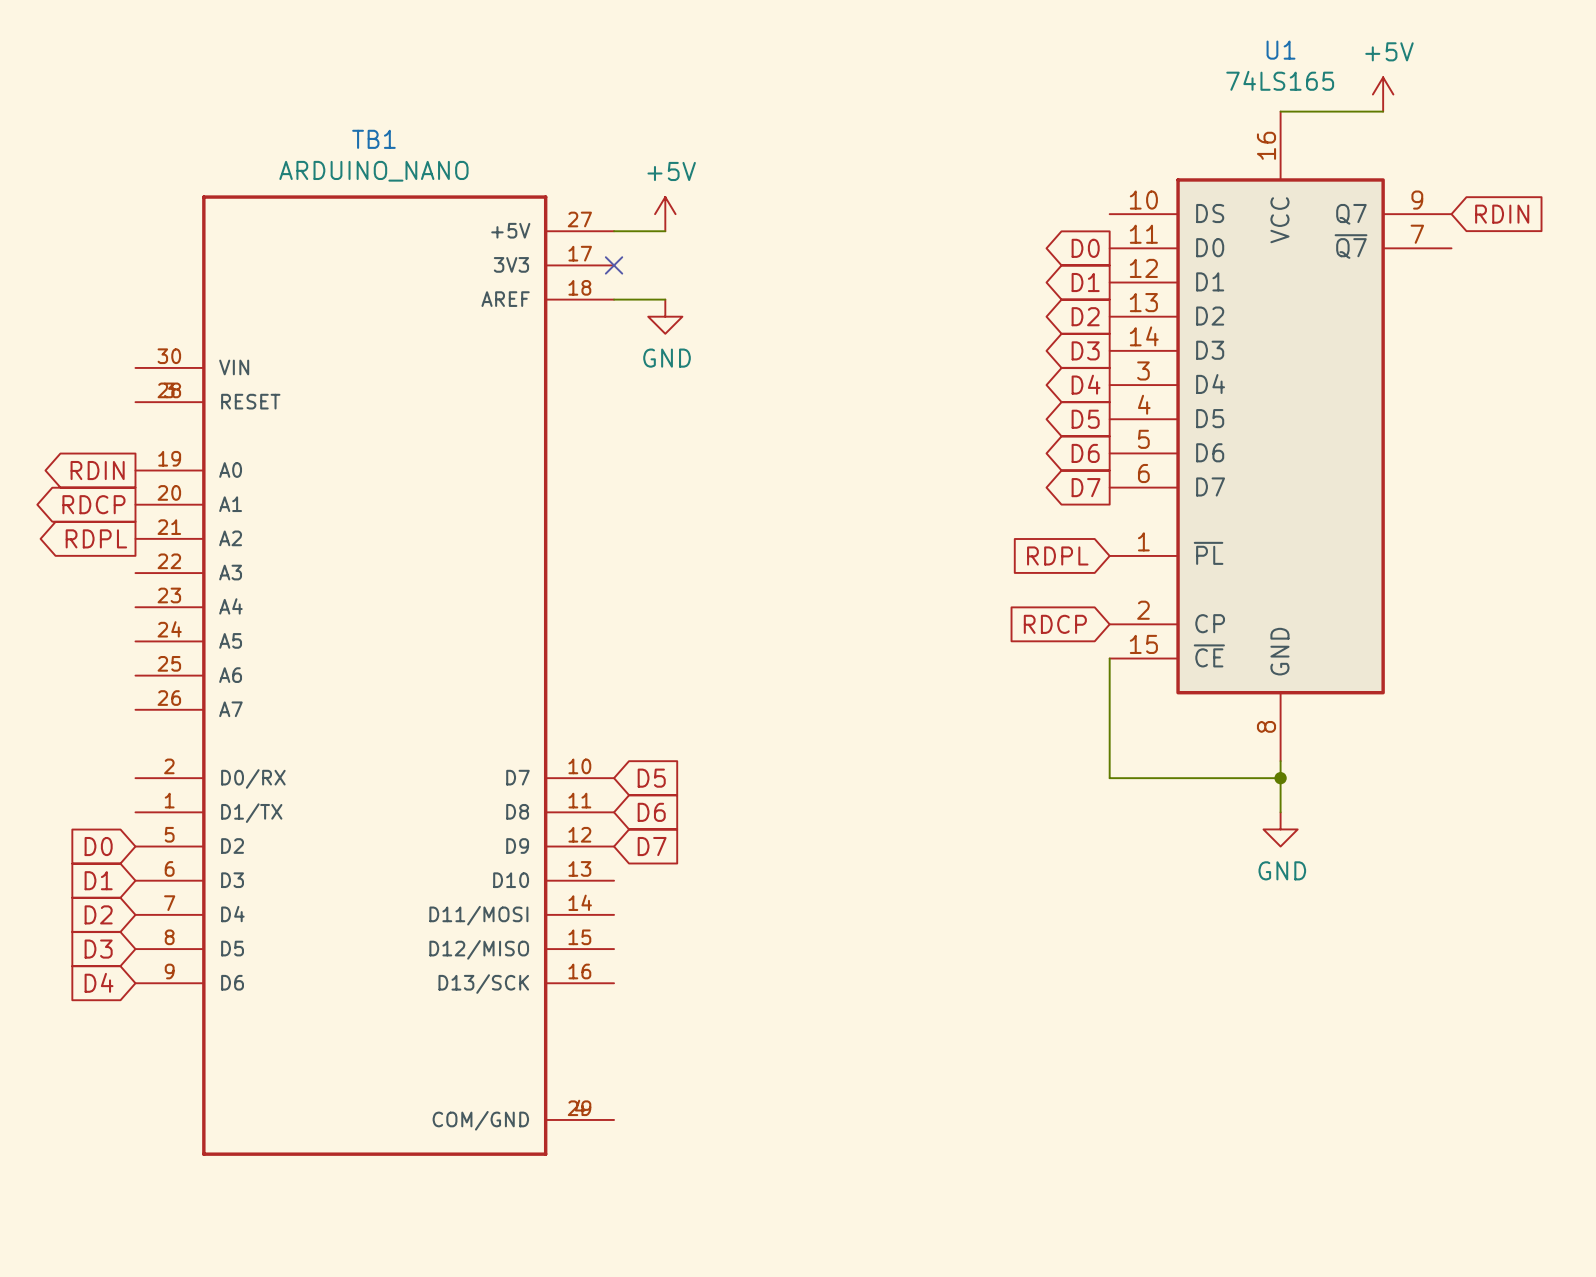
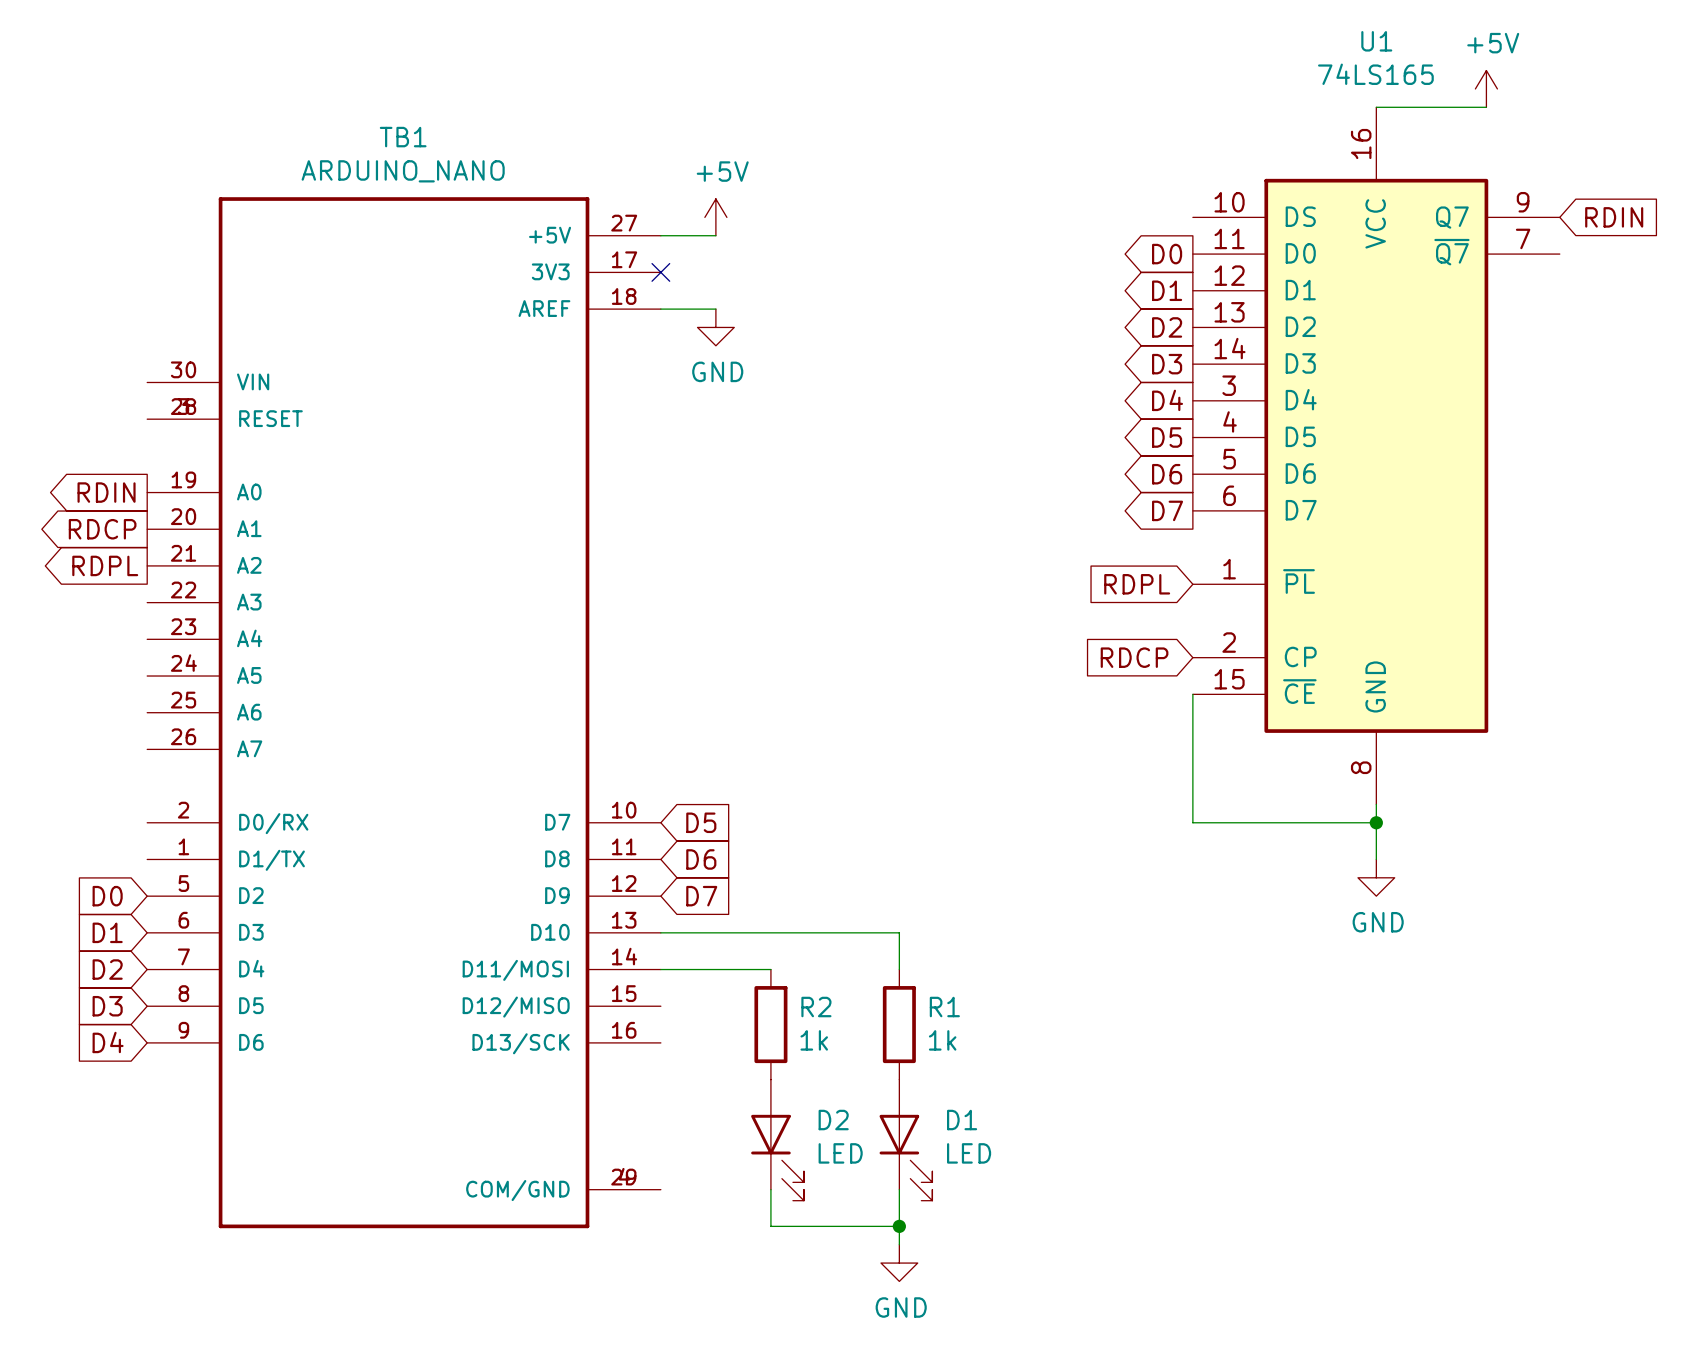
wire: none -> (660, 932) (899, 932) (899, 969)
wire: none -> (660, 969) (770, 969)
R2: none -> 1k (770, 1024)
R1: none -> 1k (899, 1024)
D2: none -> LED (777, 1140)
D1: none -> LED (905, 1140)
wire: none -> (770, 1189) (770, 1226) (899, 1226)
wire: none -> (899, 1189) (899, 1244)
junction: none -> (899, 1226)
power symbol: none -> GND (899, 1263)

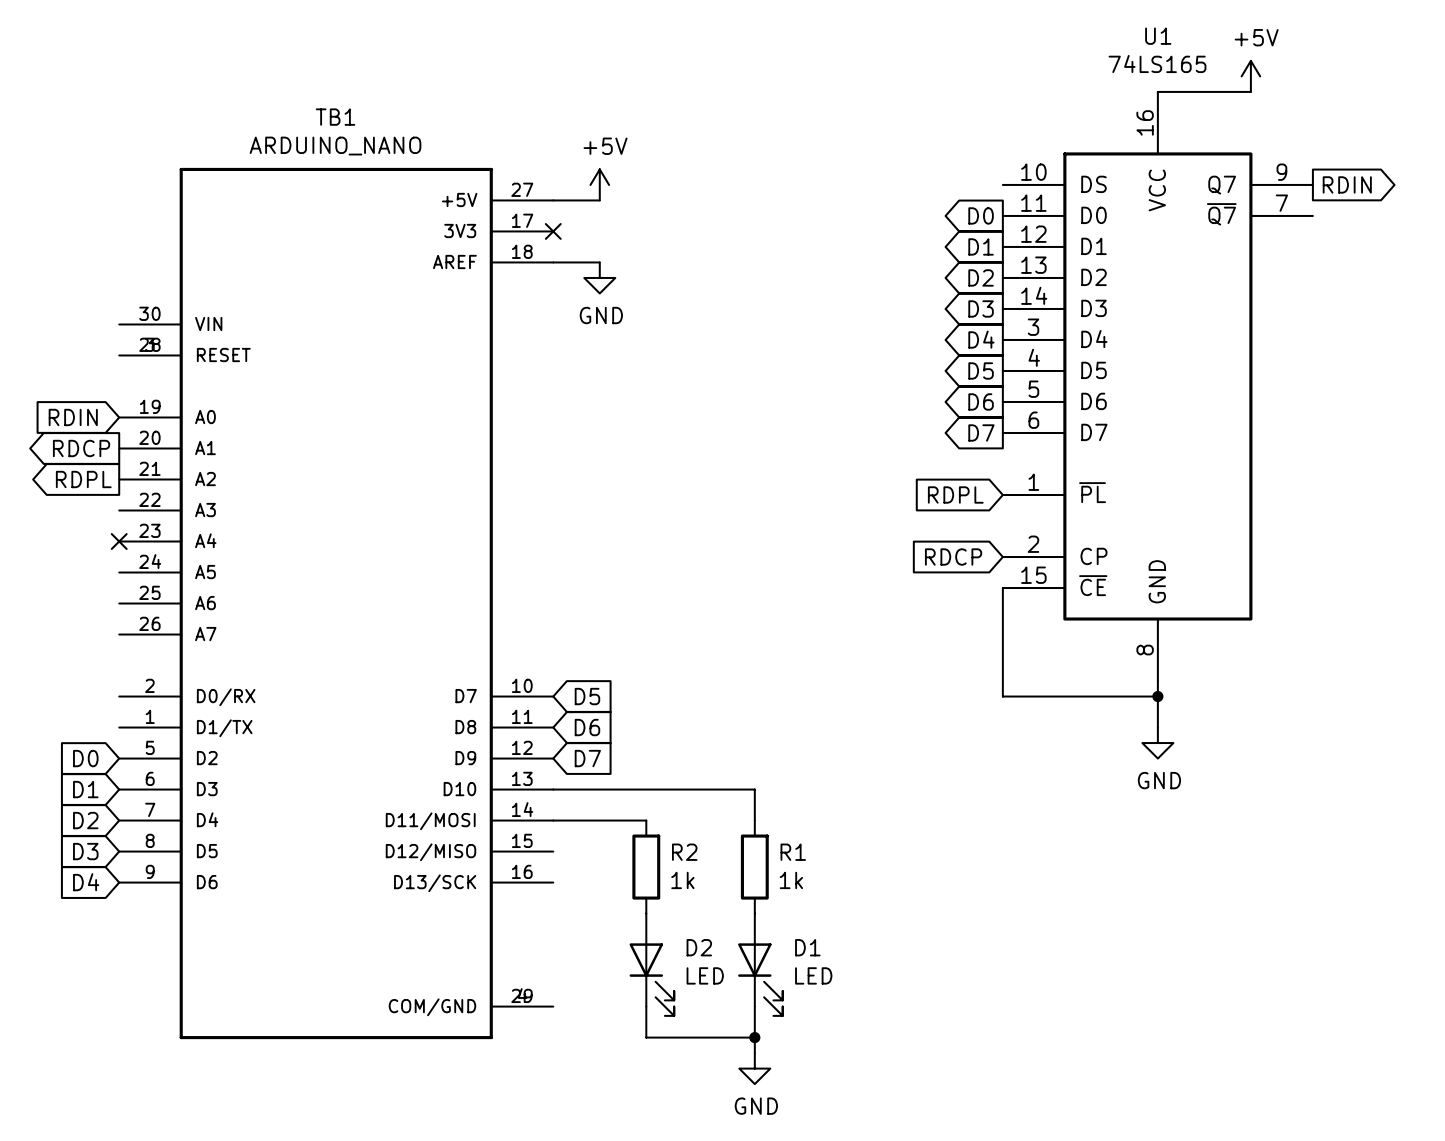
global label shape: input (1614, 217) -> output (1347, 184)
global label shape: output (106, 492) -> input (73, 417)
no-connect mark: none -> (119, 541)

